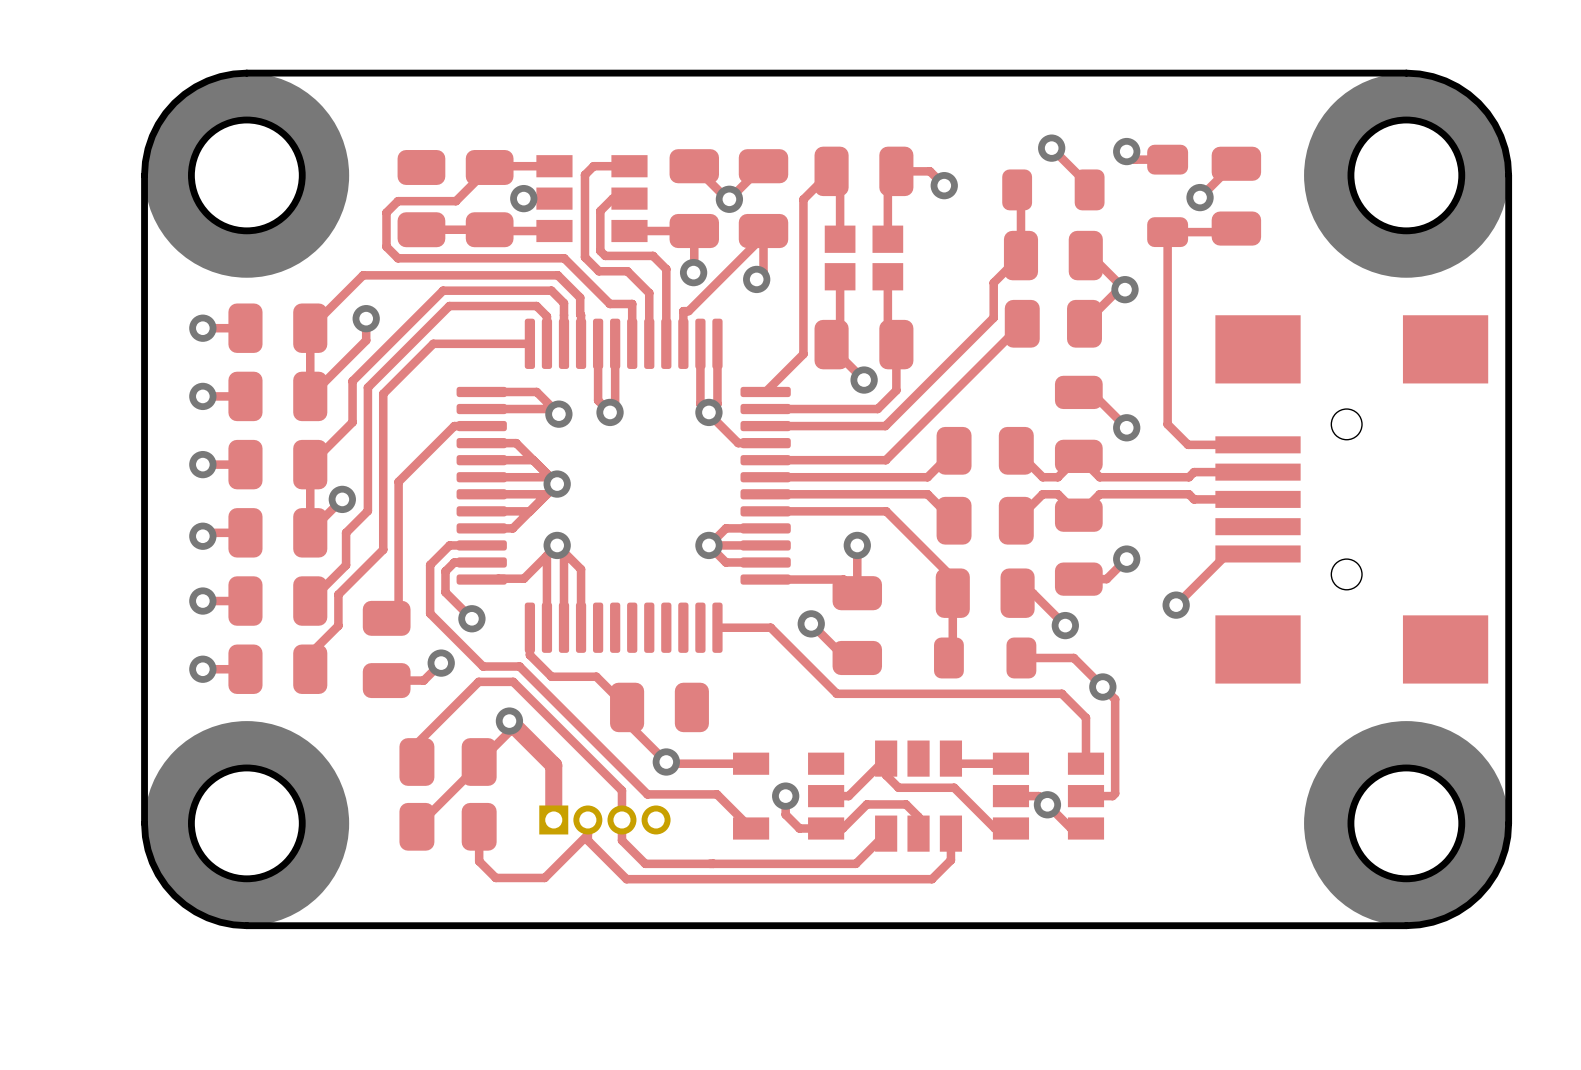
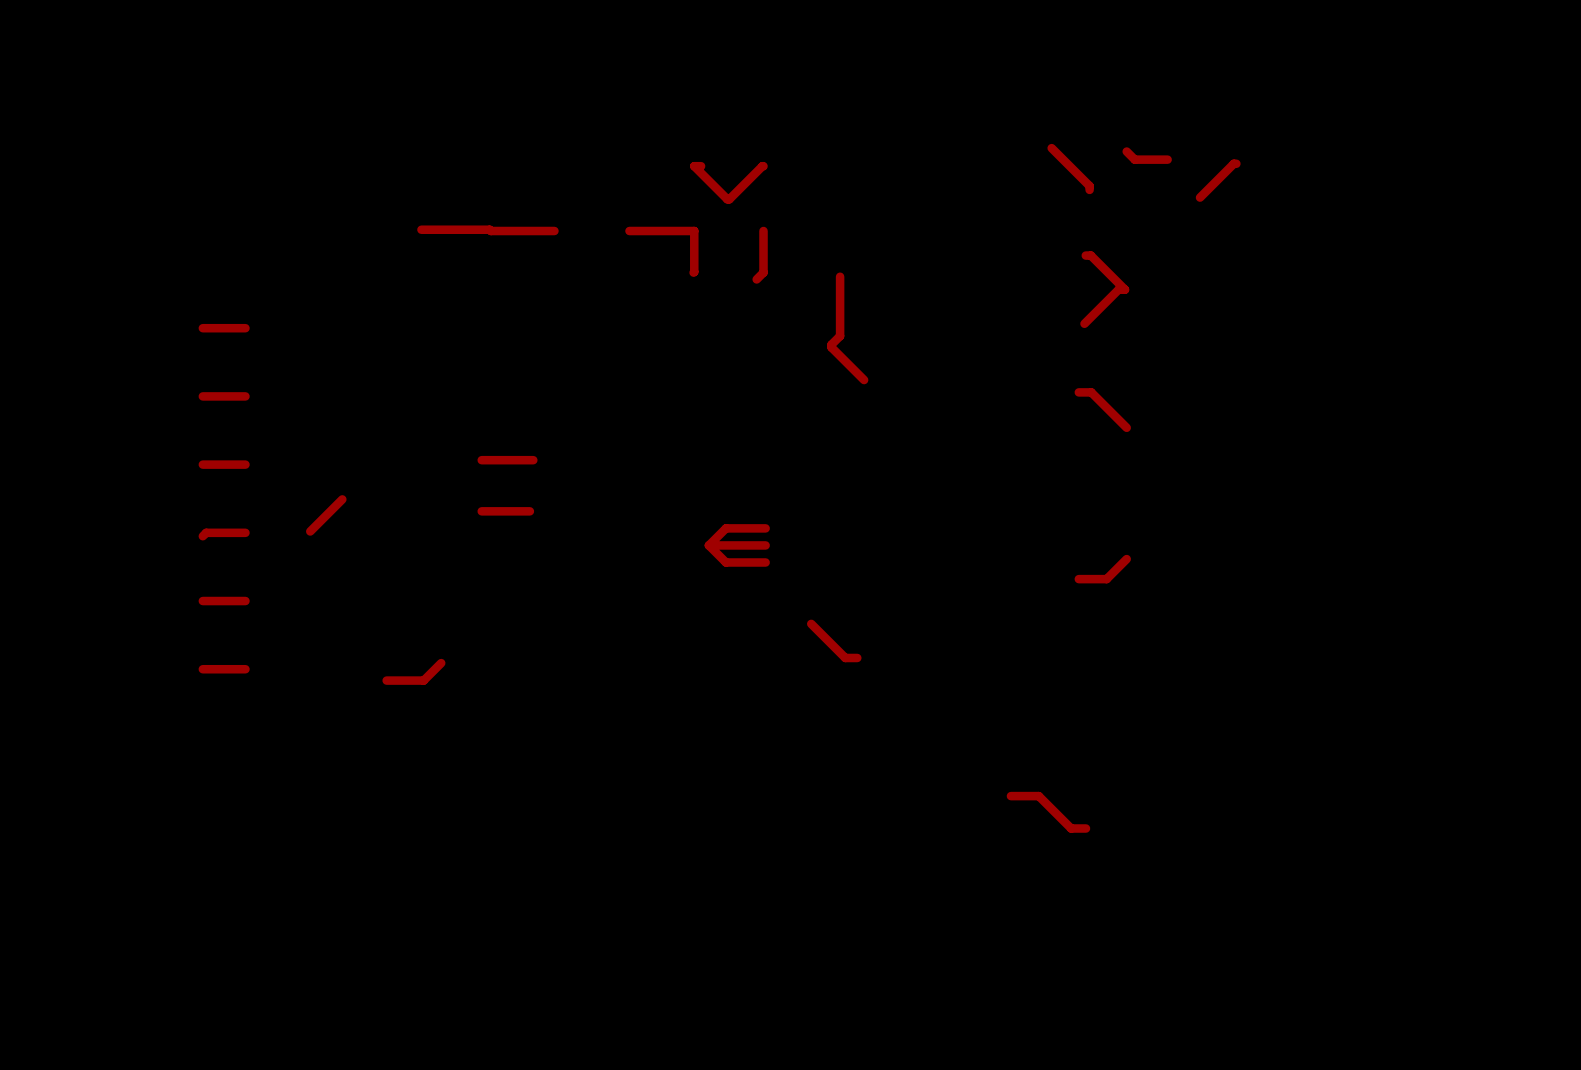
board edge: (1406, 73) (246, 73) (220, 76) (195, 86) (174, 103) (158, 124) (148, 148) (144, 175) (144, 823) (148, 849) (158, 874) (174, 895) (195, 911) (220, 922) (246, 925) (1406, 925) (1432, 922) (1457, 911) (1478, 895) (1494, 874) (1505, 849) (1507, 836) (1508, 175) (1507, 162) (1500, 136) (1494, 124) (1478, 103) (1468, 94) (1445, 80) (1432, 76) (1406, 73) -> none
round board edge: [188, 116, 306, 235] -> none
round board edge: [1347, 116, 1466, 235] -> none
via: (1051, 148) -> none
via: (1126, 151) -> none
top track: (554, 166) (490, 166) (455, 201) (397, 201) (386, 212) (386, 246) (397, 258) (564, 258) (609, 303) (632, 303) (632, 343) -> none
top track: (629, 166) (593, 166) (584, 174) (584, 257) (598, 271) (627, 271) (649, 293) (649, 343) -> none
part: (863, 171) -> none
via: (246, 175) -> none
via: (1406, 175) -> none
top track: (944, 185) (929, 171) (896, 171) (887, 179) (889, 240) -> none
via: (944, 185) -> none
top track: (1017, 189) (1020, 193) (1020, 255) (993, 282) (993, 317) (885, 426) (765, 426) -> none
part: (1053, 189) -> none
part: (1167, 195) -> none
part: (1236, 196) -> none
via: (1200, 197) -> none
part: (421, 198) -> none
part: (489, 198) -> none
via: (523, 198) -> none
part: (591, 198) -> none
top track: (629, 198) (612, 198) (600, 211) (600, 250) (605, 255) (653, 255) (666, 269) (666, 343) -> none
part: (694, 198) -> none
part: (763, 198) -> none
via: (729, 199) -> none
top track: (1236, 228) (1232, 232) (1167, 232) (1167, 424) (1188, 444) (1258, 444) -> none
top track: (763, 236) (688, 311) (683, 311) (683, 343) -> none
top track: (840, 239) (840, 179) (831, 171) (803, 199) (803, 354) (765, 391) -> none
part: (1053, 255) -> none
part: (863, 257) -> none
via: (693, 272) -> none
top track: (887, 276) (887, 336) (896, 344) (896, 390) (877, 409) (765, 409) -> none
via: (756, 279) -> none
via: (1125, 289) -> none
top track: (366, 318) (366, 340) (310, 396) (310, 328) (363, 275) (557, 275) (580, 297) (581, 343) -> none
via: (366, 318) -> none
top track: (1022, 323) (885, 460) (765, 460) -> none
part: (1053, 323) -> none
via: (202, 328) -> none
part: (277, 328) -> none
top track: (529, 343) (433, 343) (383, 393) (383, 549) (338, 594) (338, 625) (310, 653) (310, 669) -> none
top track: (546, 343) (546, 316) (536, 306) (449, 306) (367, 387) (367, 511) (346, 532) (346, 565) (310, 601) -> none
top track: (564, 343) (564, 303) (551, 290) (443, 290) (352, 381) (352, 422) (310, 464) (310, 532) -> none
top track: (615, 343) (615, 407) (610, 412) (598, 400) (598, 343) -> none
top track: (700, 343) (700, 403) (708, 412) -> none
top track: (717, 343) (717, 403) (708, 412) -> none
part: (863, 344) -> none
via: (864, 380) -> none
top track: (481, 391) (536, 391) (558, 414) -> none
via: (202, 396) -> none
part: (277, 396) -> none
top track: (553, 409) (481, 409) -> none
via: (610, 412) -> none
top track: (708, 412) (738, 443) (765, 443) -> none
via: (708, 412) -> none
via: (558, 414) -> none
part: (1078, 424) -> none
top track: (481, 426) (454, 426) (398, 481) (398, 606) (386, 618) -> none
via: (1126, 427) -> none
top track: (481, 443) (516, 443) (557, 484) (512, 528) (481, 528) -> none
top track: (954, 450) (927, 477) (766, 478) -> none
part: (985, 450) -> none
top track: (1016, 450) (1042, 477) (1057, 477) (1078, 456) (1099, 477) (1188, 477) (1194, 472) (1258, 472) -> none
via: (202, 464) -> none
part: (277, 464) -> none
top track: (550, 477) (481, 477) -> none
via: (557, 484) -> none
part: (623, 485) -> none
top track: (766, 493) (927, 494) (954, 520) -> none
top track: (546, 494) (481, 494) -> none
via: (342, 499) -> none
top track: (1258, 499) (1194, 499) (1188, 494) (1099, 494) (1078, 515) (1057, 494) (1042, 494) (1016, 520) -> none
part: (1351, 499) -> none
top track: (765, 511) (886, 511) (952, 577) (952, 654) (948, 657) -> none
part: (985, 520) -> none
part: (277, 532) -> none
via: (202, 536) -> none
top track: (481, 545) (449, 545) (430, 564) (430, 613) (483, 666) (519, 666) (647, 794) (716, 794) (751, 828) -> none
via: (557, 545) -> none
via: (708, 545) -> none
top track: (857, 545) (857, 593) (843, 579) (765, 579) -> none
via: (857, 545) -> none
part: (1078, 547) -> none
top track: (564, 552) (564, 627) -> none
top track: (1258, 553) (1227, 553) (1176, 605) -> none
top track: (546, 555) (546, 627) -> none
via: (1126, 559) -> none
top track: (481, 562) (454, 562) (445, 571) (445, 592) (471, 618) -> none
top track: (481, 579) (523, 578) (557, 545) (581, 569) (581, 627) -> none
part: (985, 593) -> none
top track: (1017, 593) (1032, 593) (1065, 625) -> none
via: (202, 601) -> none
part: (277, 601) -> none
via: (1176, 605) -> none
via: (471, 618) -> none
via: (811, 623) -> none
part: (857, 625) -> none
via: (1065, 625) -> none
top track: (529, 627) (529, 655) (551, 676) (596, 676) (627, 707) (627, 722) (668, 763) (751, 763) -> none
top track: (717, 627) (770, 627) (836, 693) (1061, 693) (1085, 717) (1085, 763) -> none
part: (386, 649) -> none
part: (985, 657) -> none
top track: (1021, 657) (1073, 657) (1115, 699) (1115, 793) (1112, 796) (1085, 796) -> none
via: (441, 663) -> none
via: (202, 669) -> none
part: (277, 669) -> none
via: (1102, 686) -> none
part: (659, 707) -> none
via: (509, 721) -> none
top track: (950, 758) (956, 763) (1010, 763) -> none
top track: (416, 762) (416, 743) (478, 681) (513, 681) (621, 790) (621, 840) (645, 863) (855, 863) (886, 833) -> none
part: (448, 762) -> none
top track: (479, 762) (509, 731) (509, 721) (553, 765) (553, 819) -> none
via: (666, 762) -> none
round board edge: [188, 764, 306, 883] -> none
top track: (479, 764) (416, 826) (416, 823) -> none
round board edge: [1347, 764, 1466, 883] -> none
top track: (785, 796) (785, 814) (799, 828) (842, 828) (866, 804) (906, 804) (918, 816) (918, 833) -> none
via: (785, 796) -> none
part: (788, 796) -> none
top track: (826, 796) (848, 796) (886, 758) (886, 775) (898, 787) (954, 787) (994, 828) (1010, 828) -> none
part: (918, 796) -> none
part: (1048, 796) -> none
via: (1047, 804) -> none
top track: (587, 819) (587, 840) (626, 879) (931, 879) (950, 860) (950, 833) -> none
part: (604, 819) -> none
via: (246, 823) -> none
via: (1406, 823) -> none
part: (448, 826) -> none
top track: (479, 826) (479, 861) (495, 877) (544, 877) (587, 834) -> none

